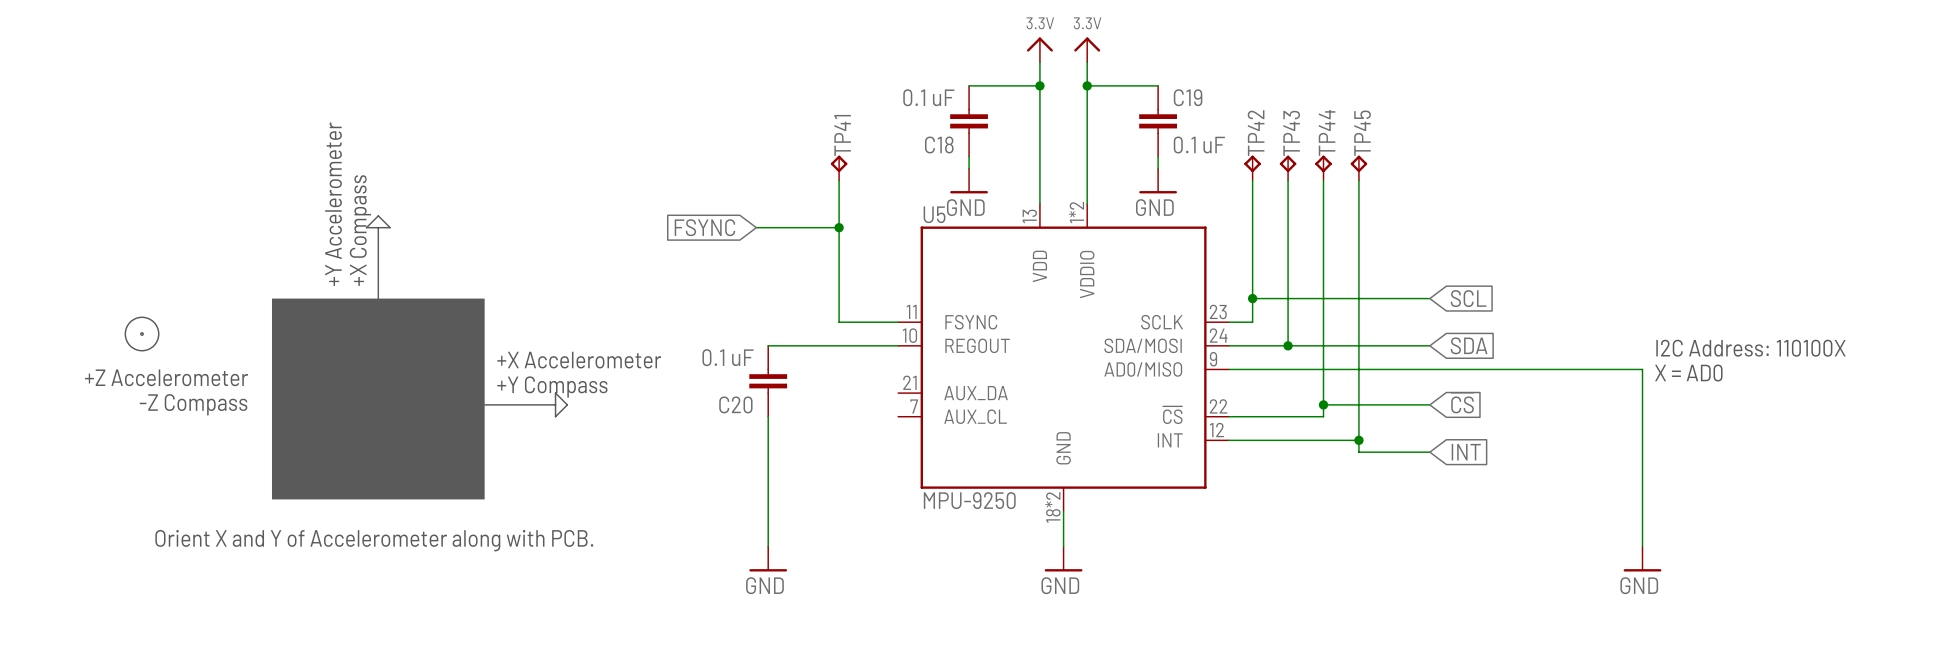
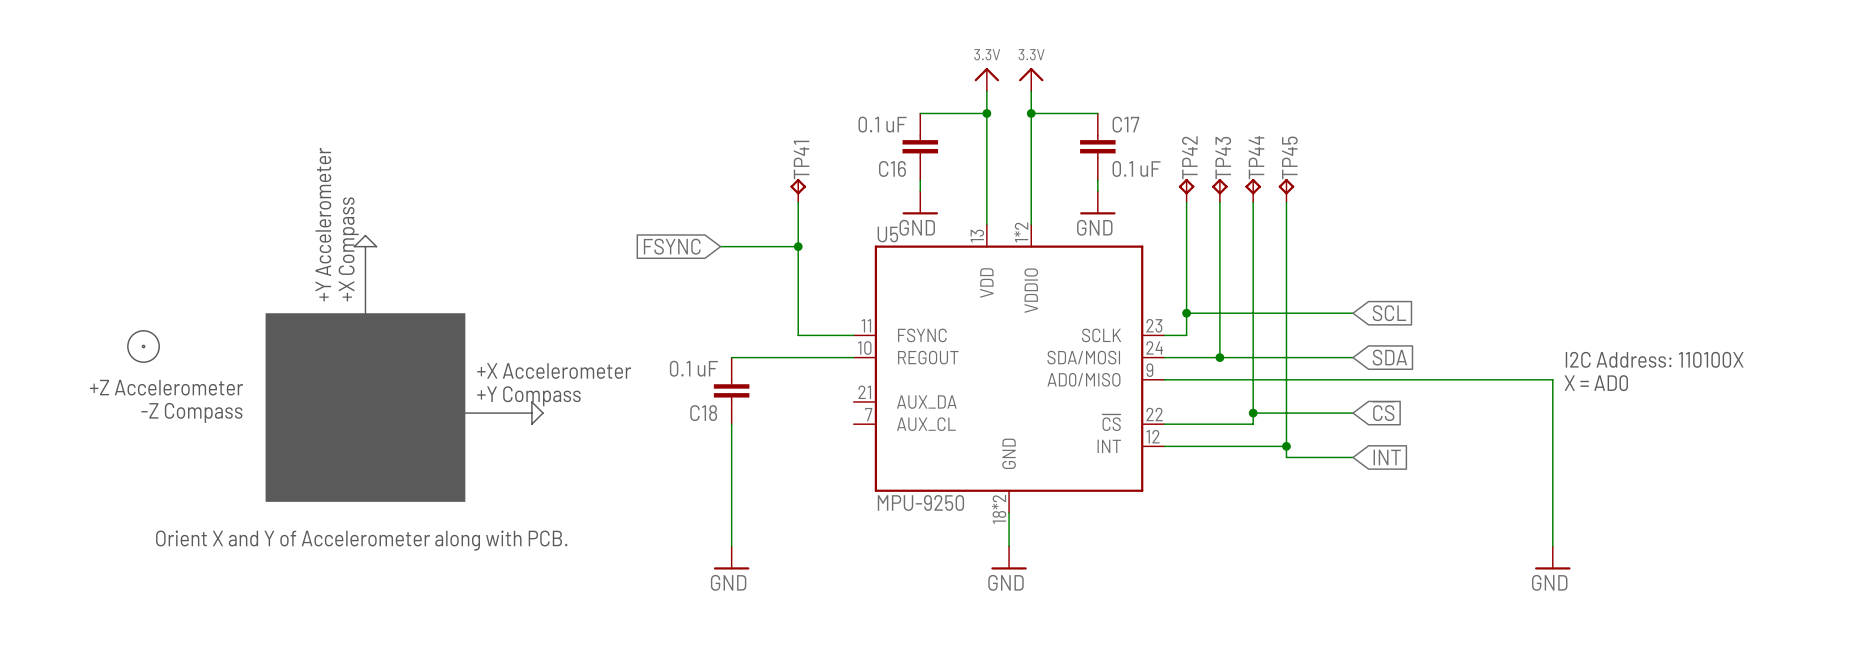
C19 name: C19 (1188, 97) -> C17 (1125, 124)
C18 name: C18 (939, 144) -> C16 (892, 168)
C20 name: C20 (735, 404) -> C18 (703, 413)

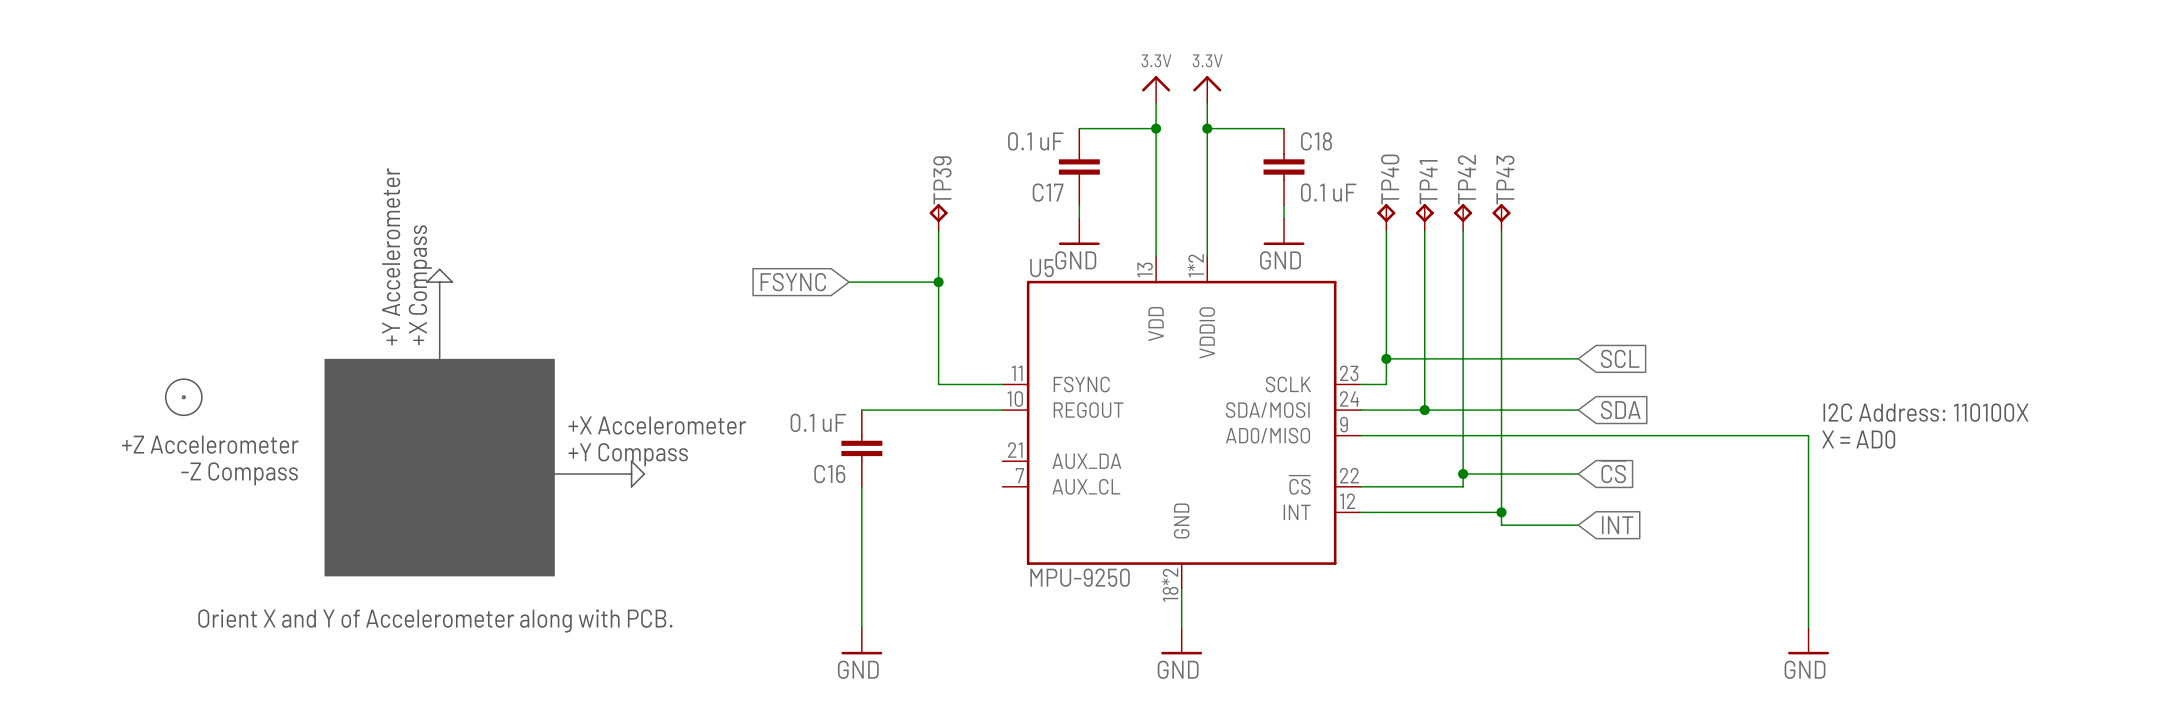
C17 name: C17 (1125, 124) -> C18 (1316, 141)
TP42 name: TP42 (1189, 157) -> TP40 (1390, 179)
TP44 name: TP44 (1256, 157) -> TP42 (1466, 179)
TP45 name: TP45 (1289, 157) -> TP43 (1505, 179)
TP43 name: TP43 (1223, 158) -> TP41 (1428, 182)
TP41 name: TP41 (801, 159) -> TP39 (942, 180)
C16 name: C16 (892, 168) -> C17 (1048, 192)
C18 name: C18 (703, 413) -> C16 (829, 474)

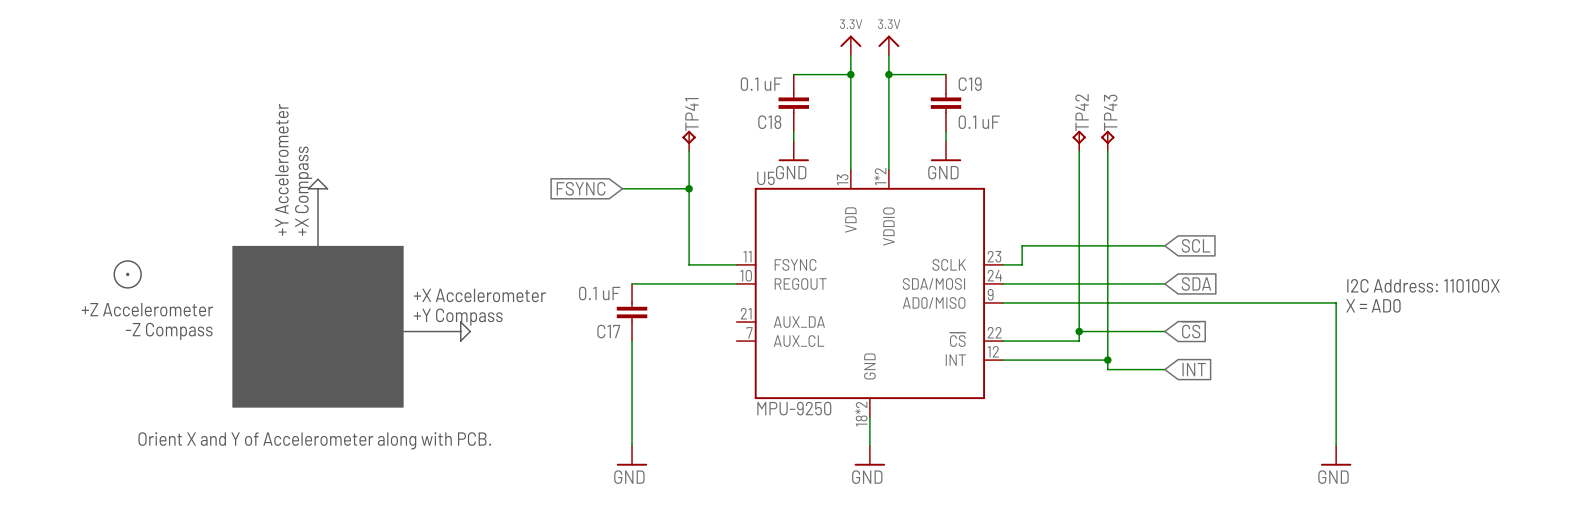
C18 name: C18 (1316, 141) -> C19 (970, 84)
TP39 name: TP39 (942, 180) -> TP41 (691, 114)
C17 name: C17 (1048, 192) -> C18 (769, 122)
TP40: (1386, 217) -> none
TP41: (1424, 217) -> none
wire: (1386, 230) (1386, 358) -> none
wire: (1424, 230) (1424, 410) -> none
junction: (1386, 358) -> none
junction: (1424, 410) -> none
C16 name: C16 (829, 474) -> C17 (608, 331)

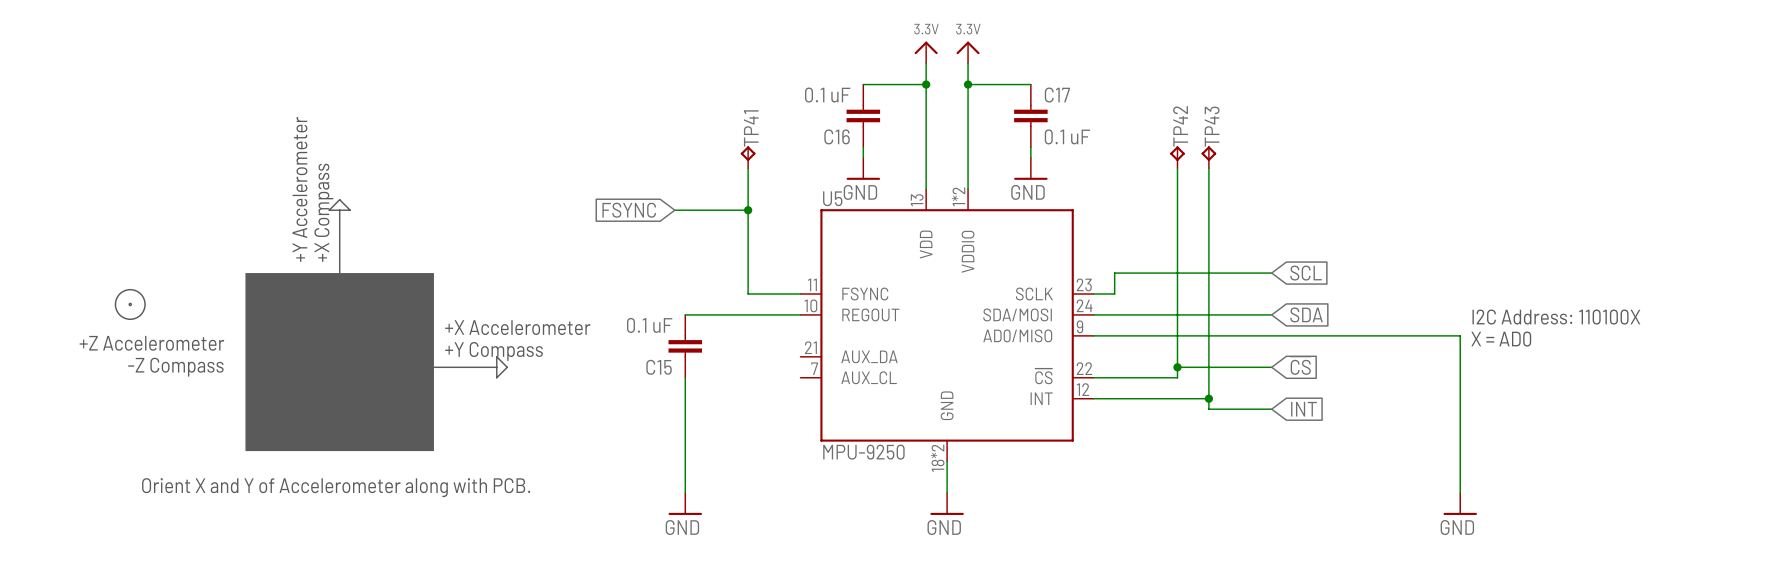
C19 name: C19 (970, 84) -> C17 (1057, 95)
C18 name: C18 (769, 122) -> C16 (837, 136)
C17 name: C17 (608, 331) -> C15 (659, 367)

